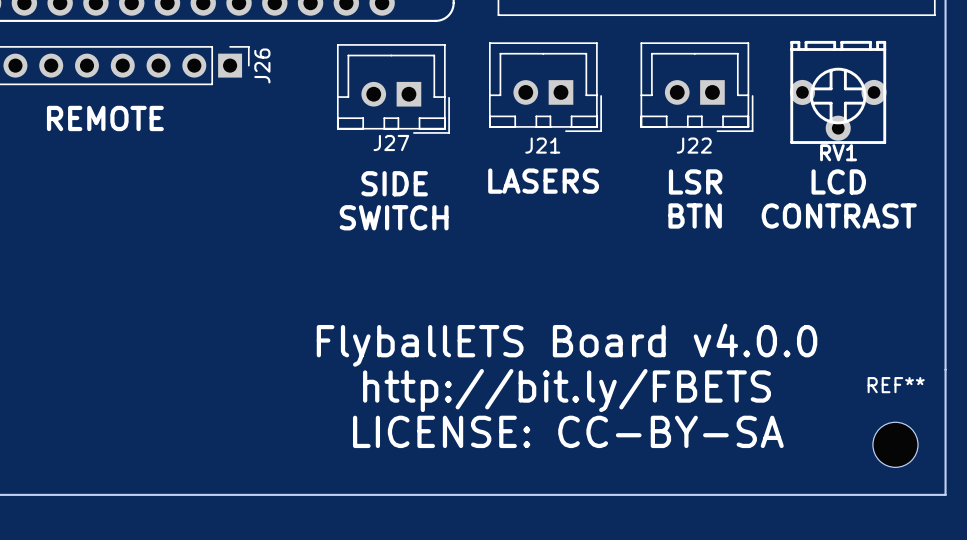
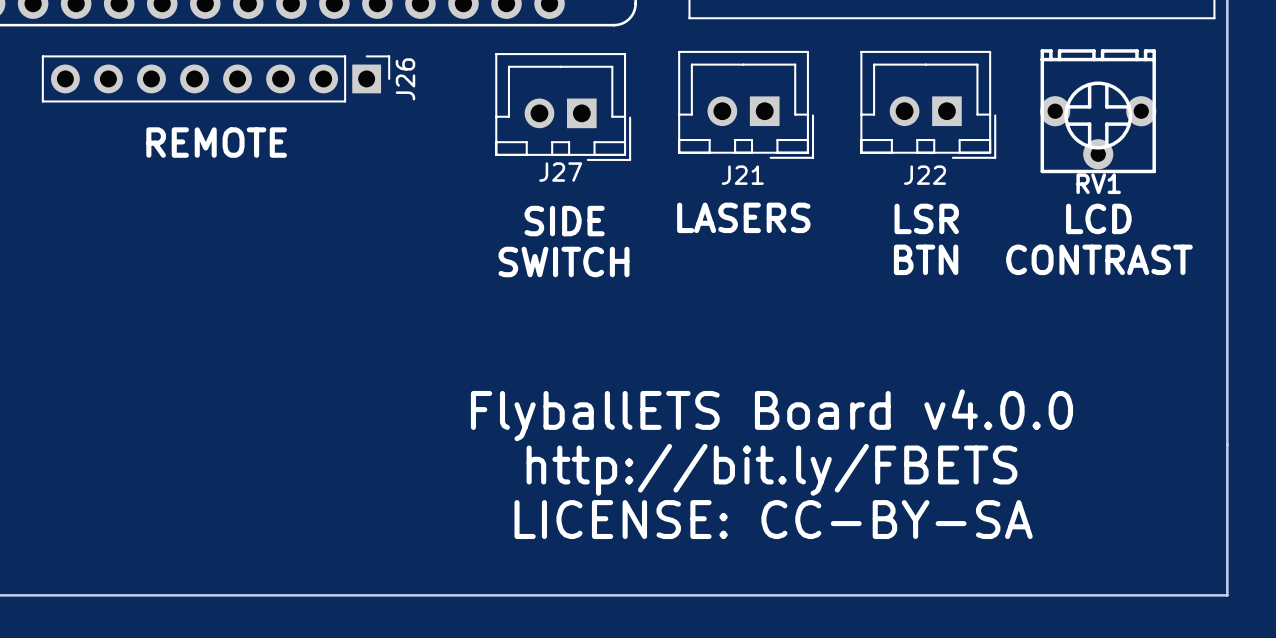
REF**: (895, 444) -> none

